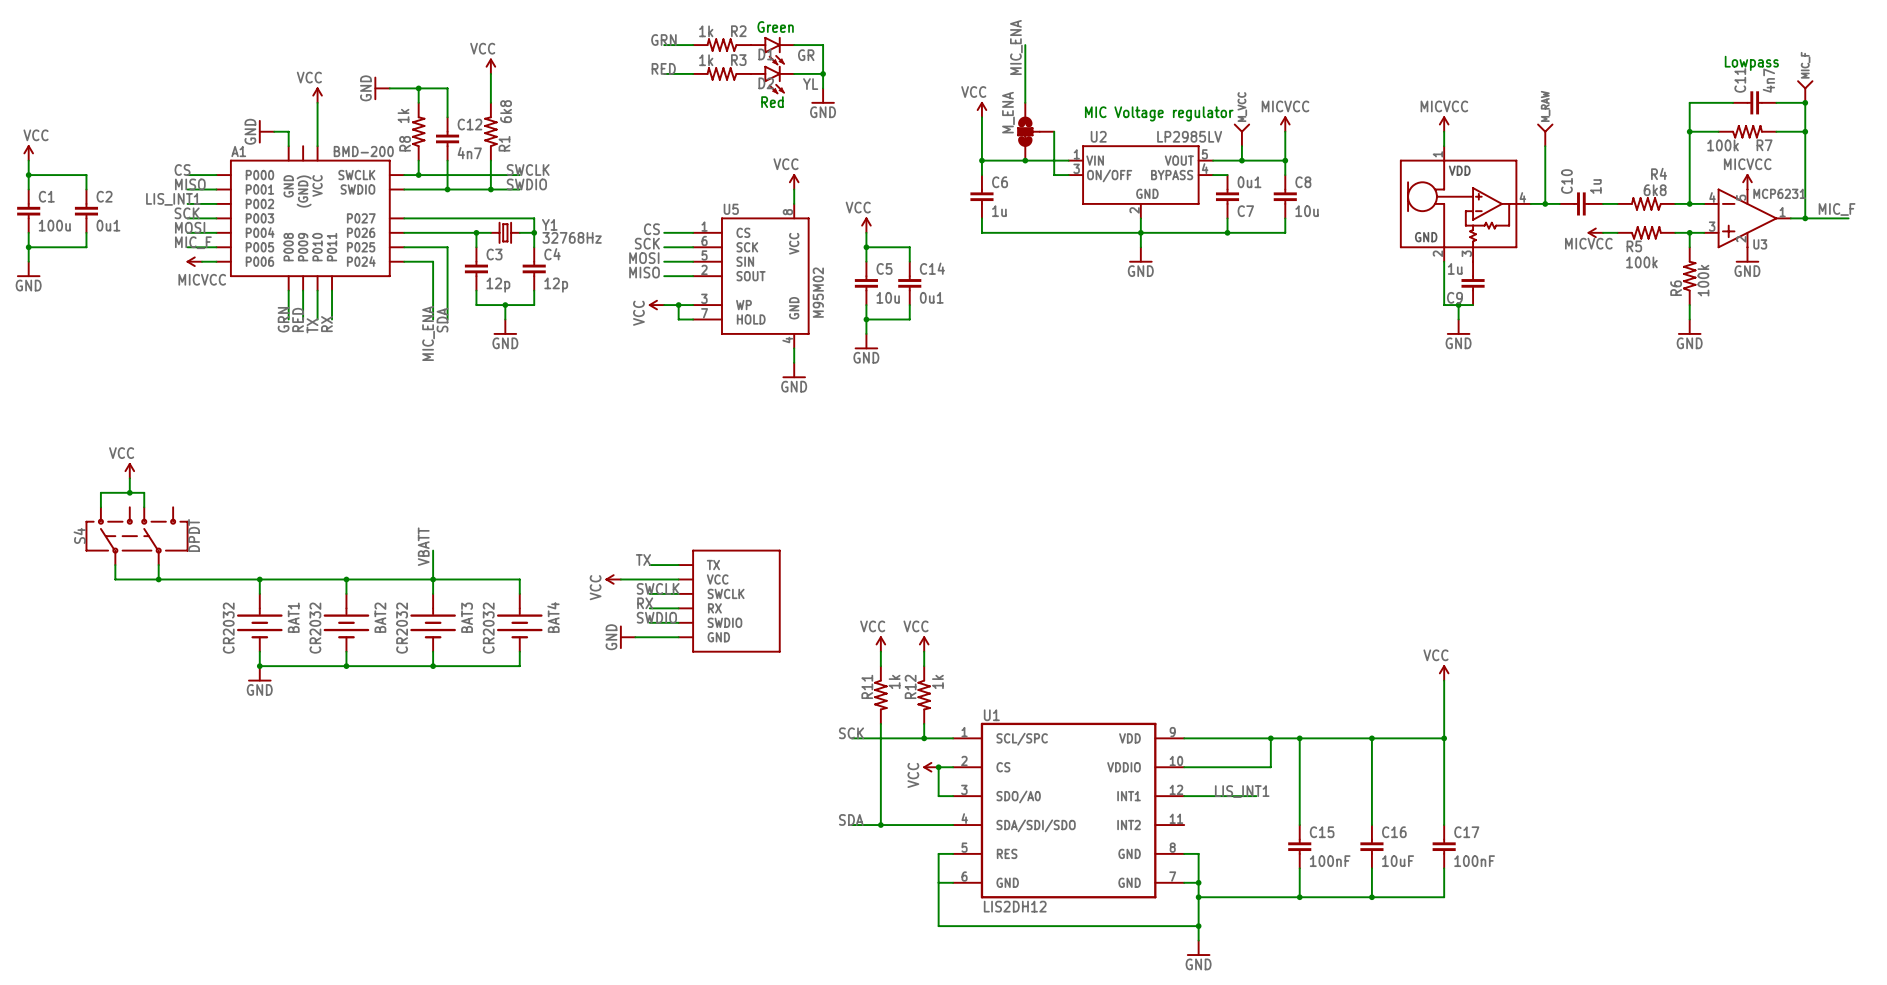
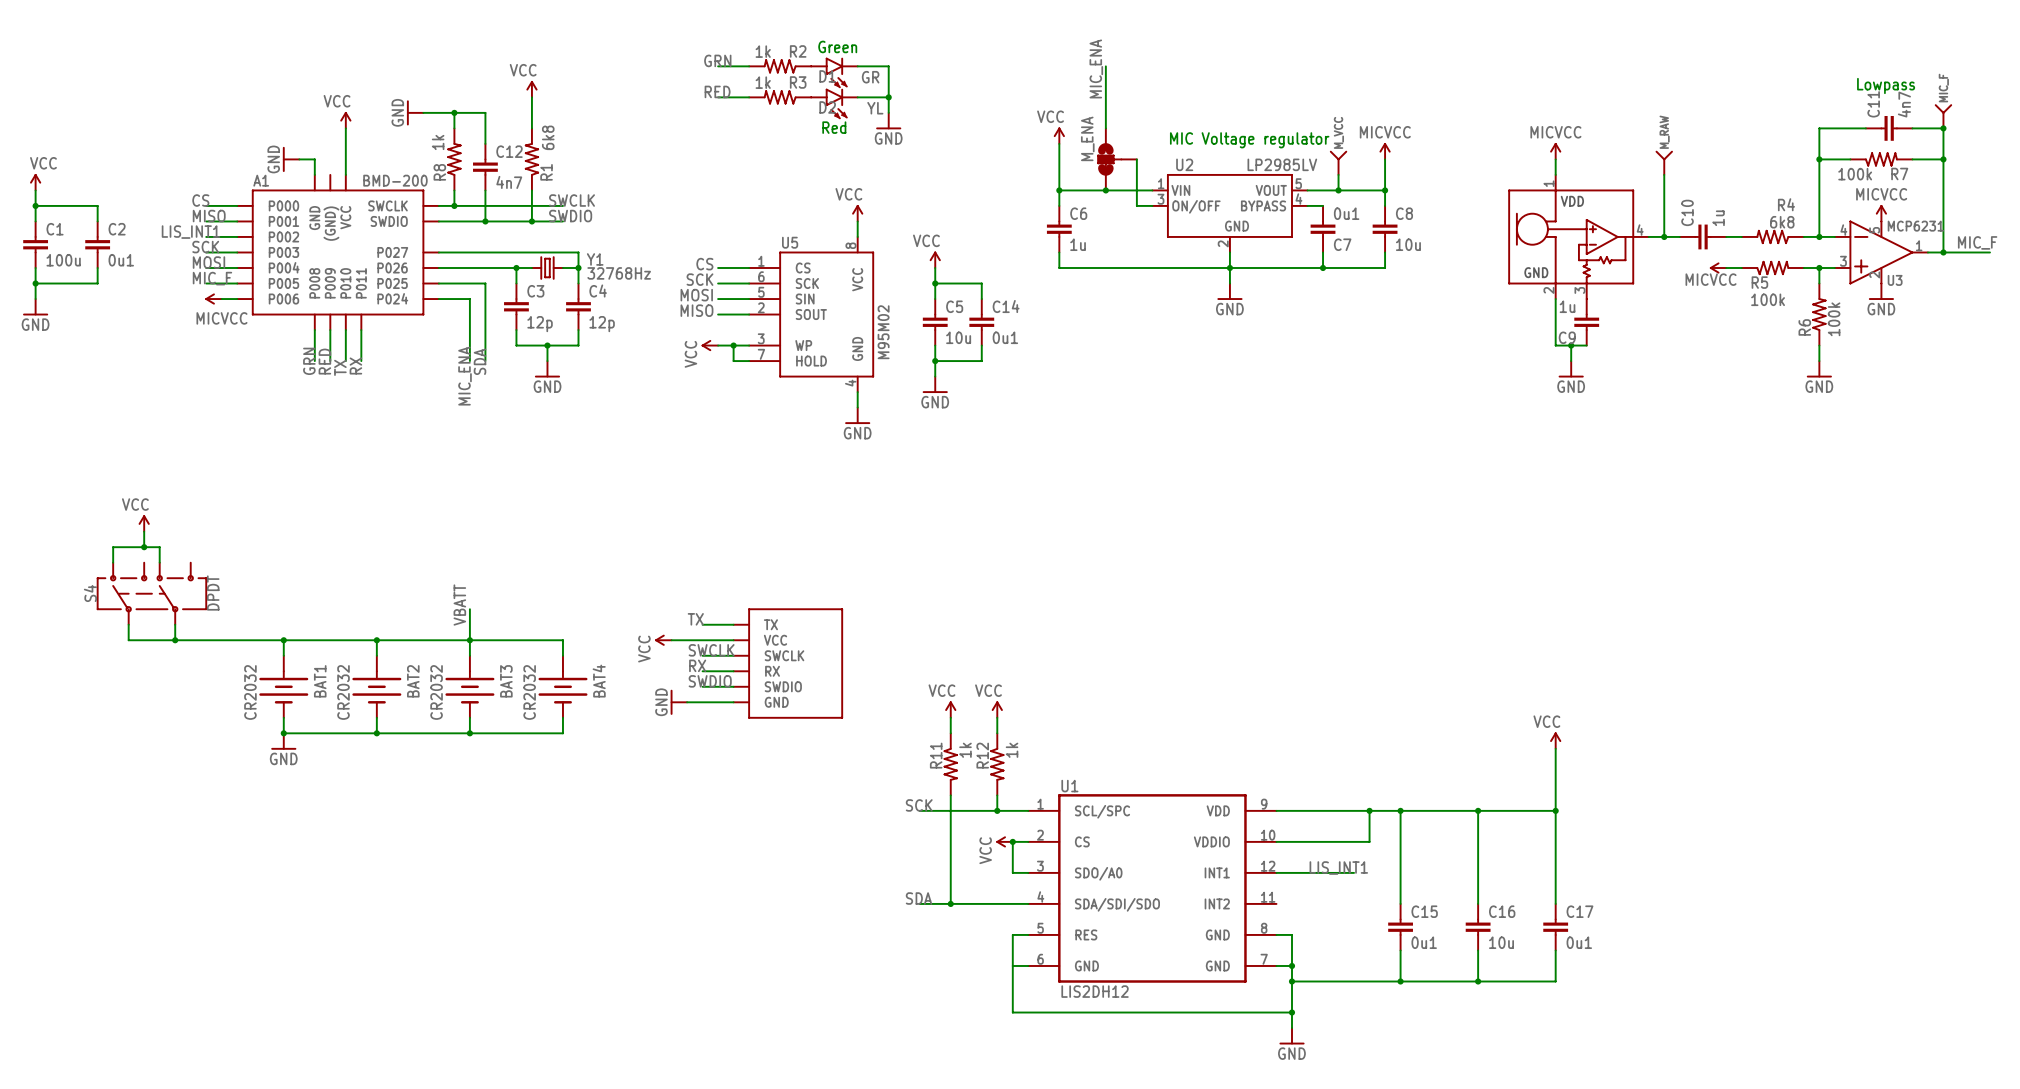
C15 value: 100nF (1330, 861) -> 0u1 (1424, 942)
C16 value: 10uF (1398, 861) -> 10u (1501, 942)
C17 value: 100nF (1474, 861) -> 0u1 (1579, 942)

